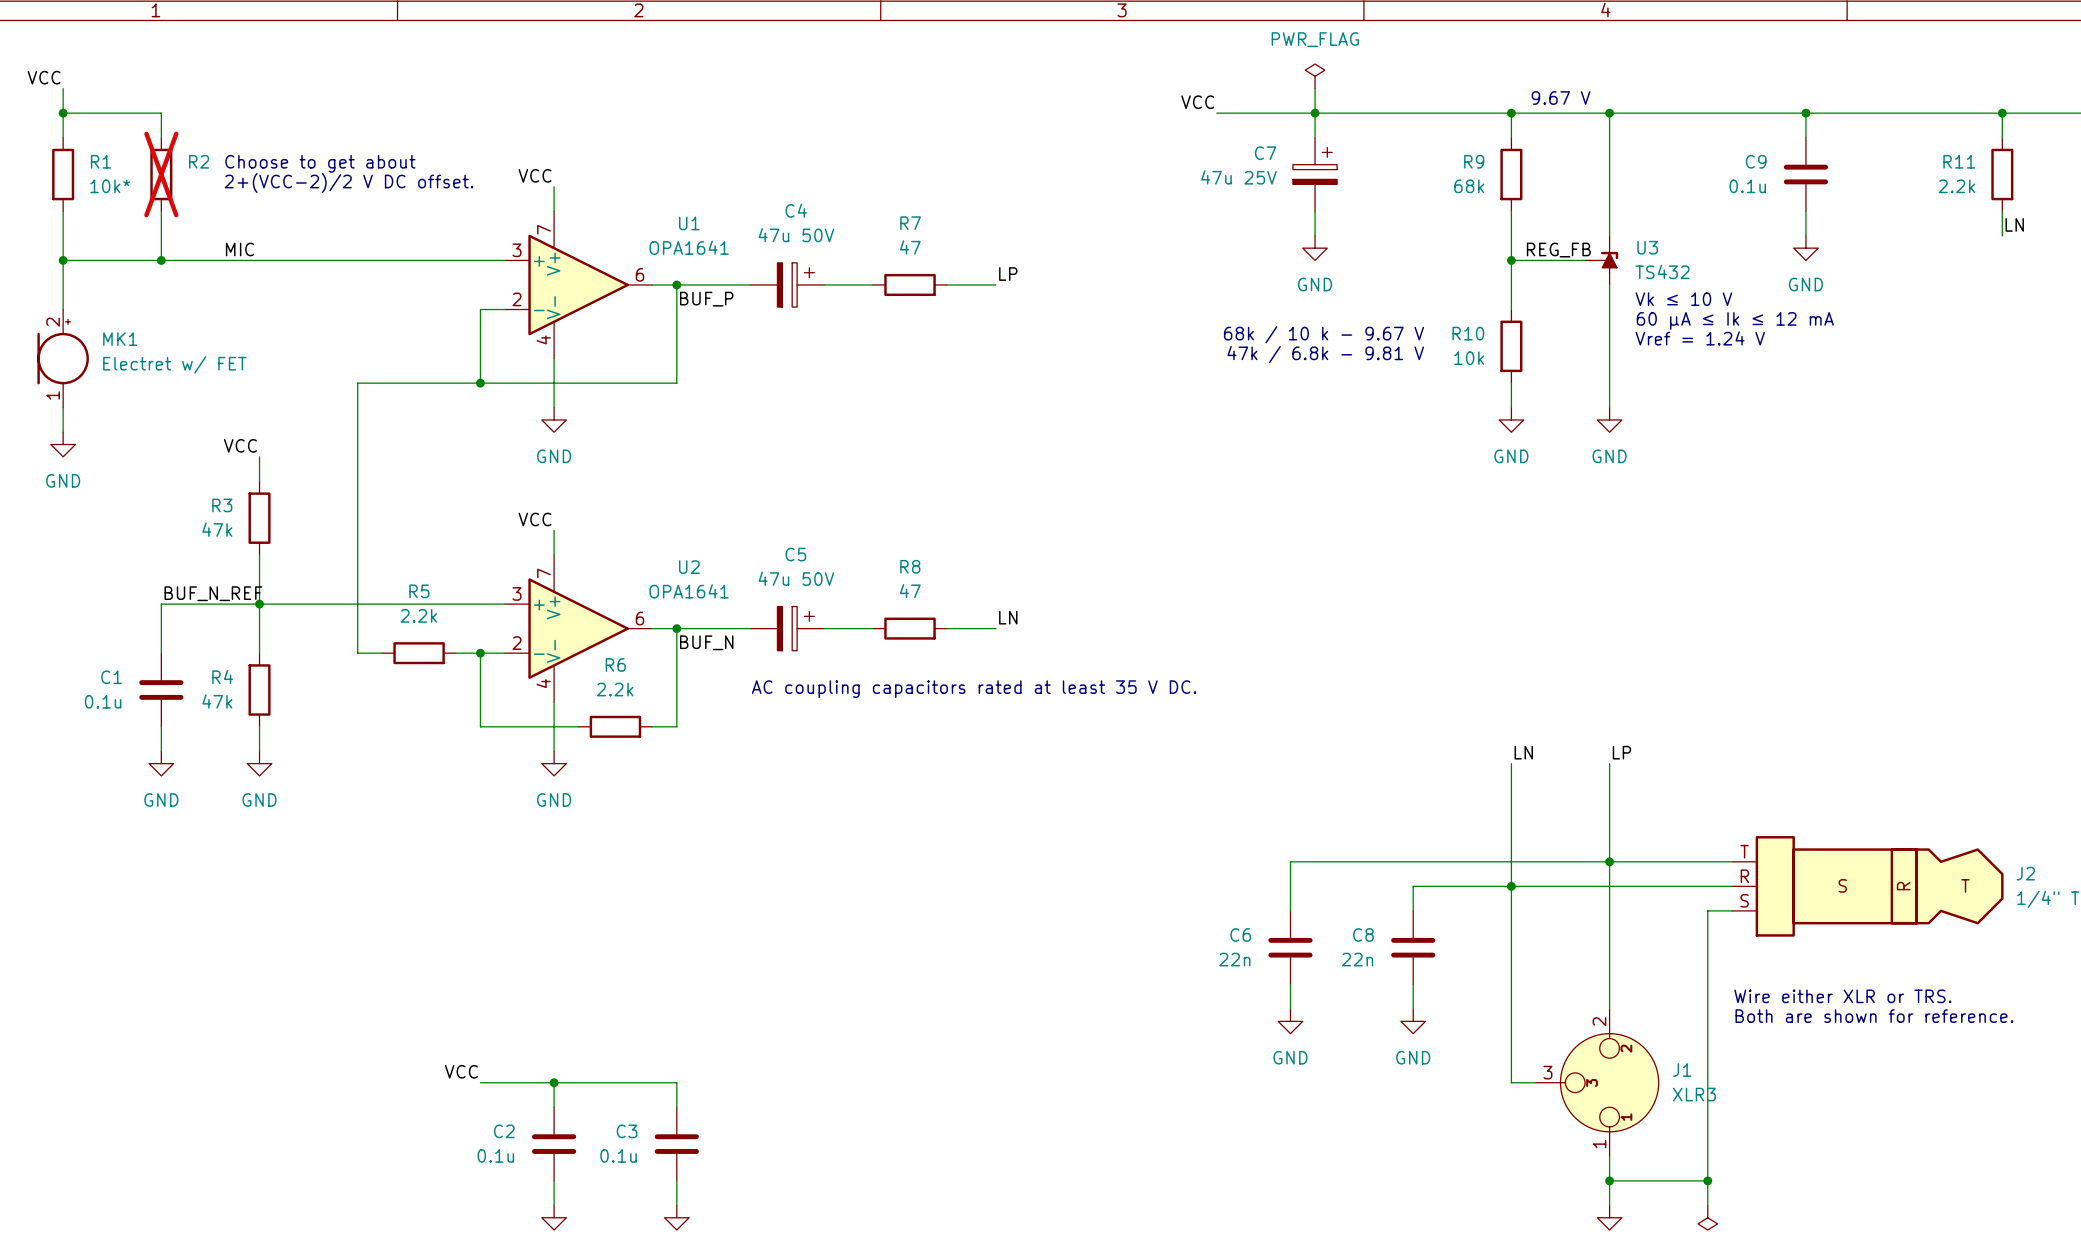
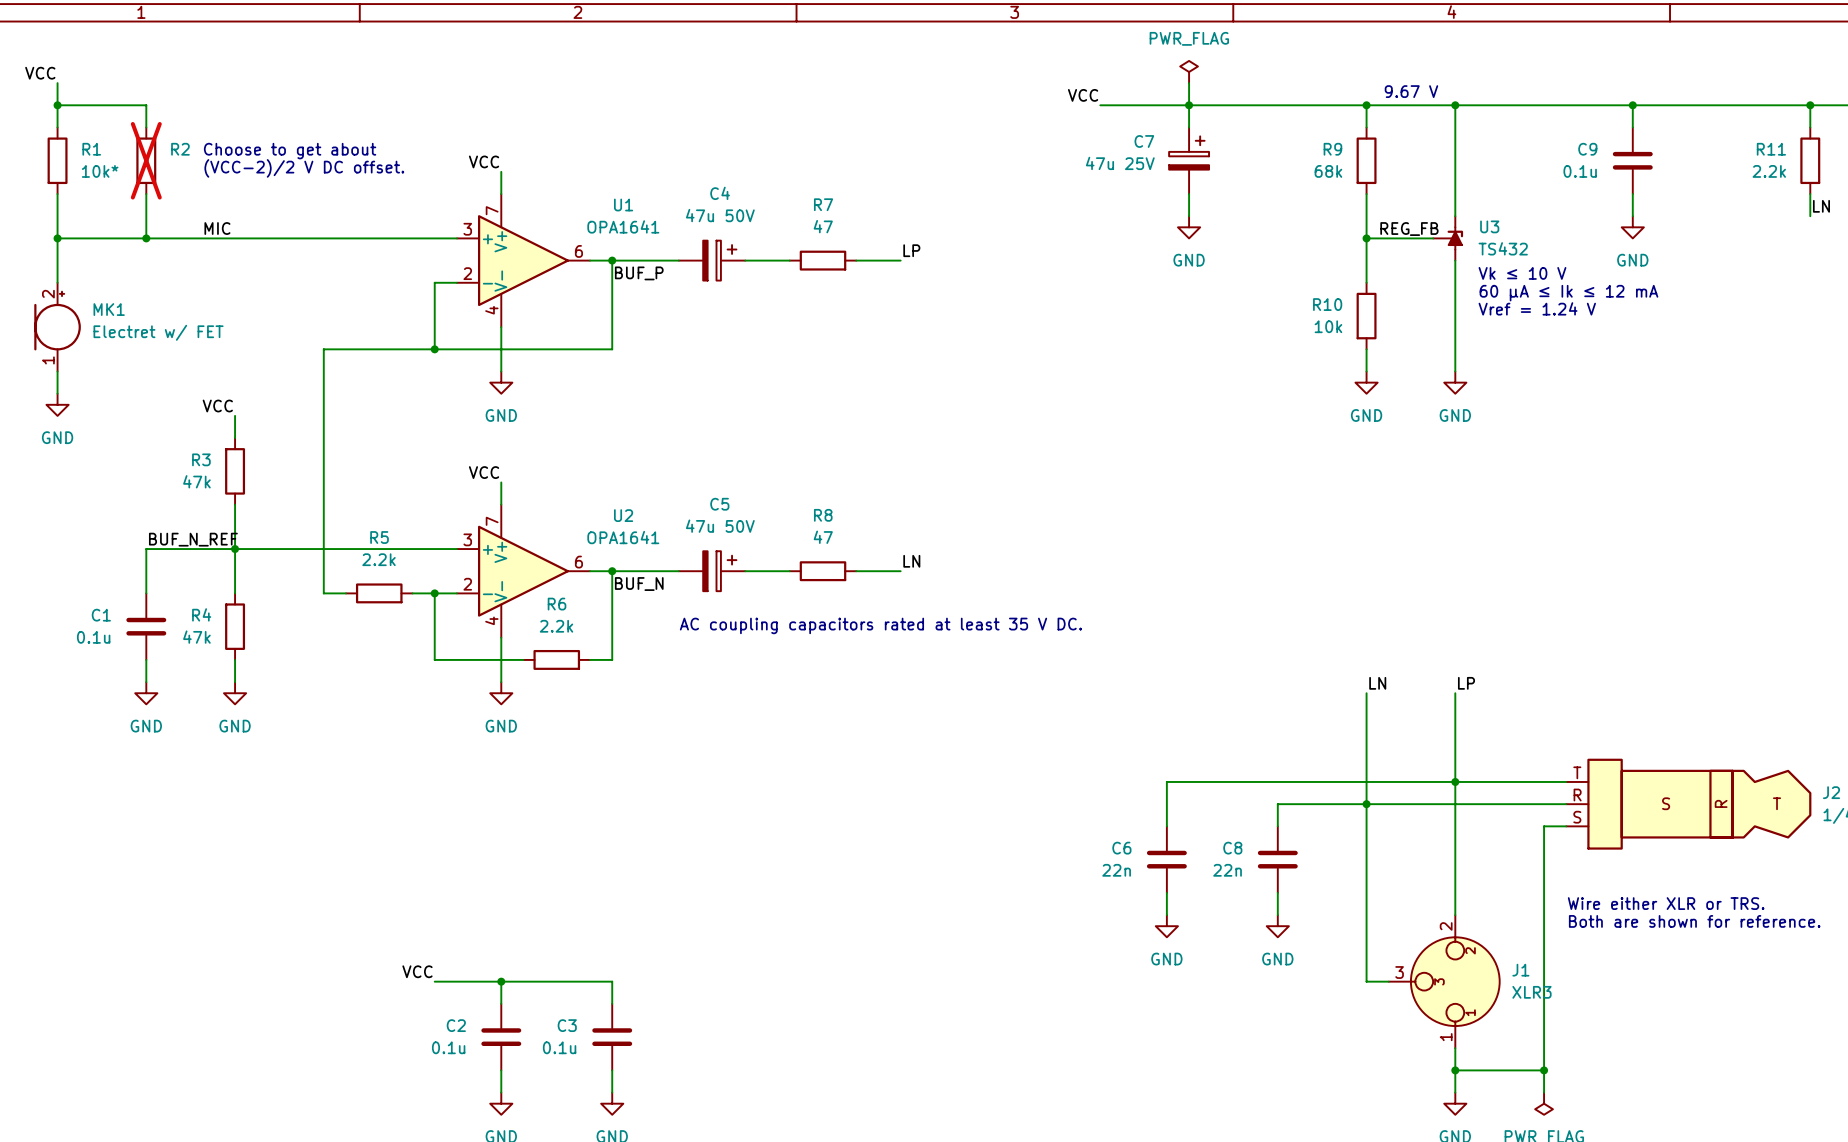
text: 2+(VCC-2)/2 V DC offset. (349, 182) -> (VCC-2)/2 V DC offset. (304, 168)
text: 68k / 10 k - 9.67 V (1324, 334) -> none
text: 47k / 6.8k - 9.81 V (1325, 354) -> none

